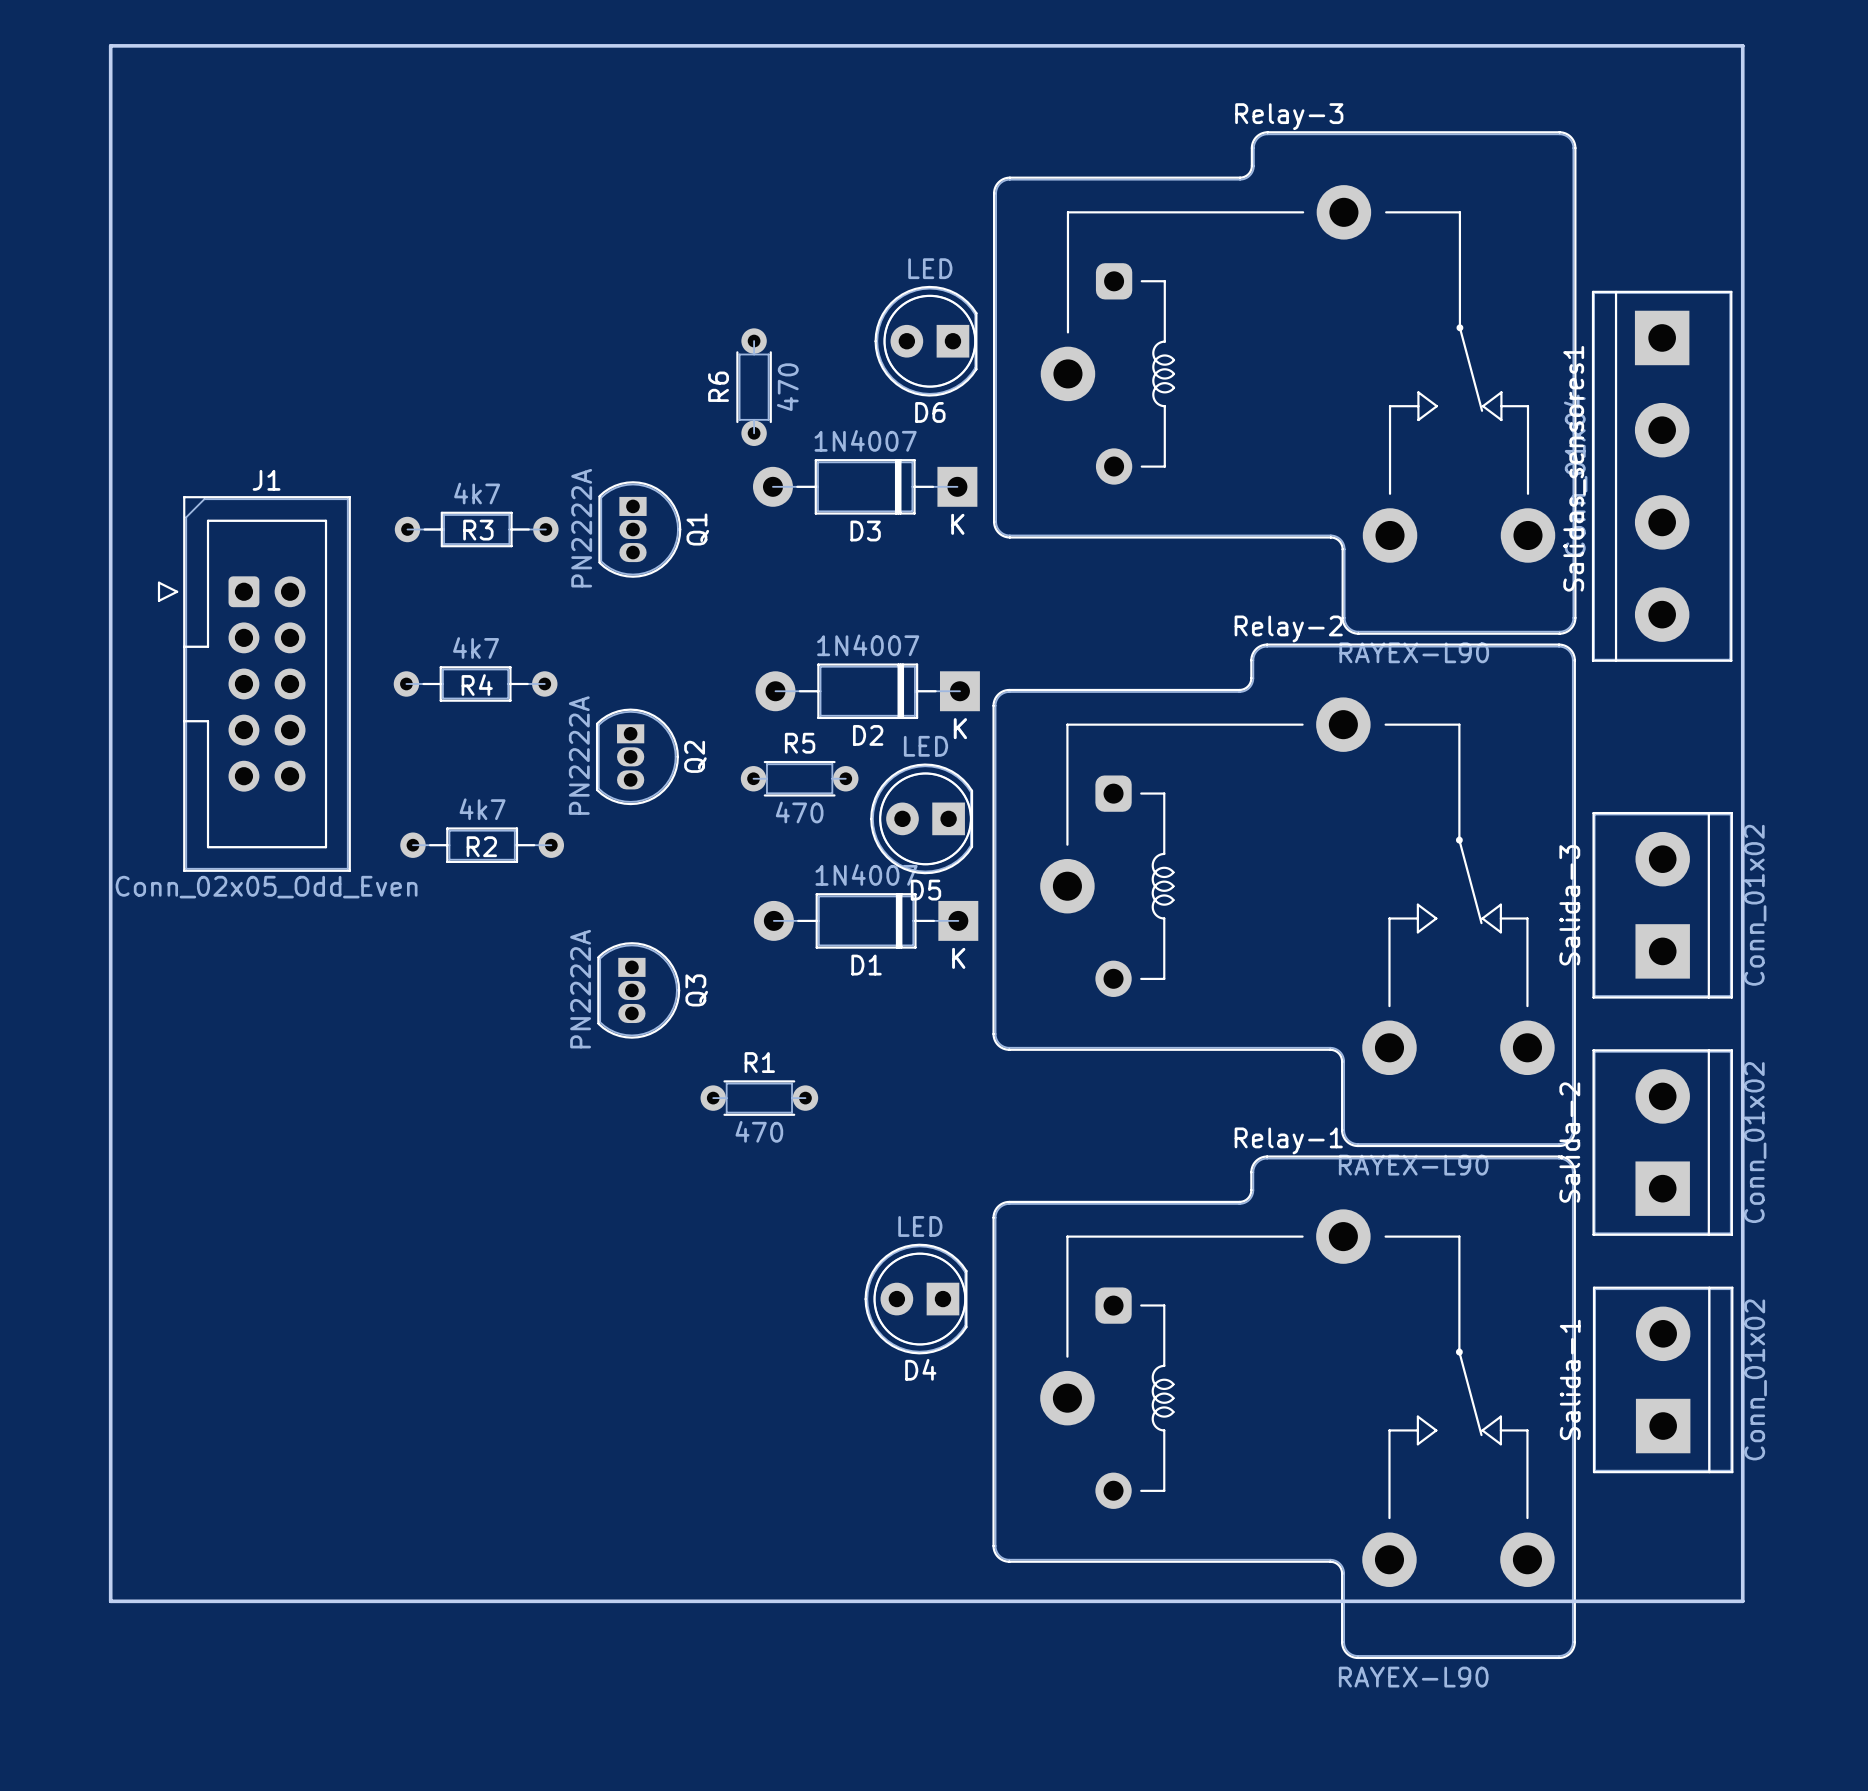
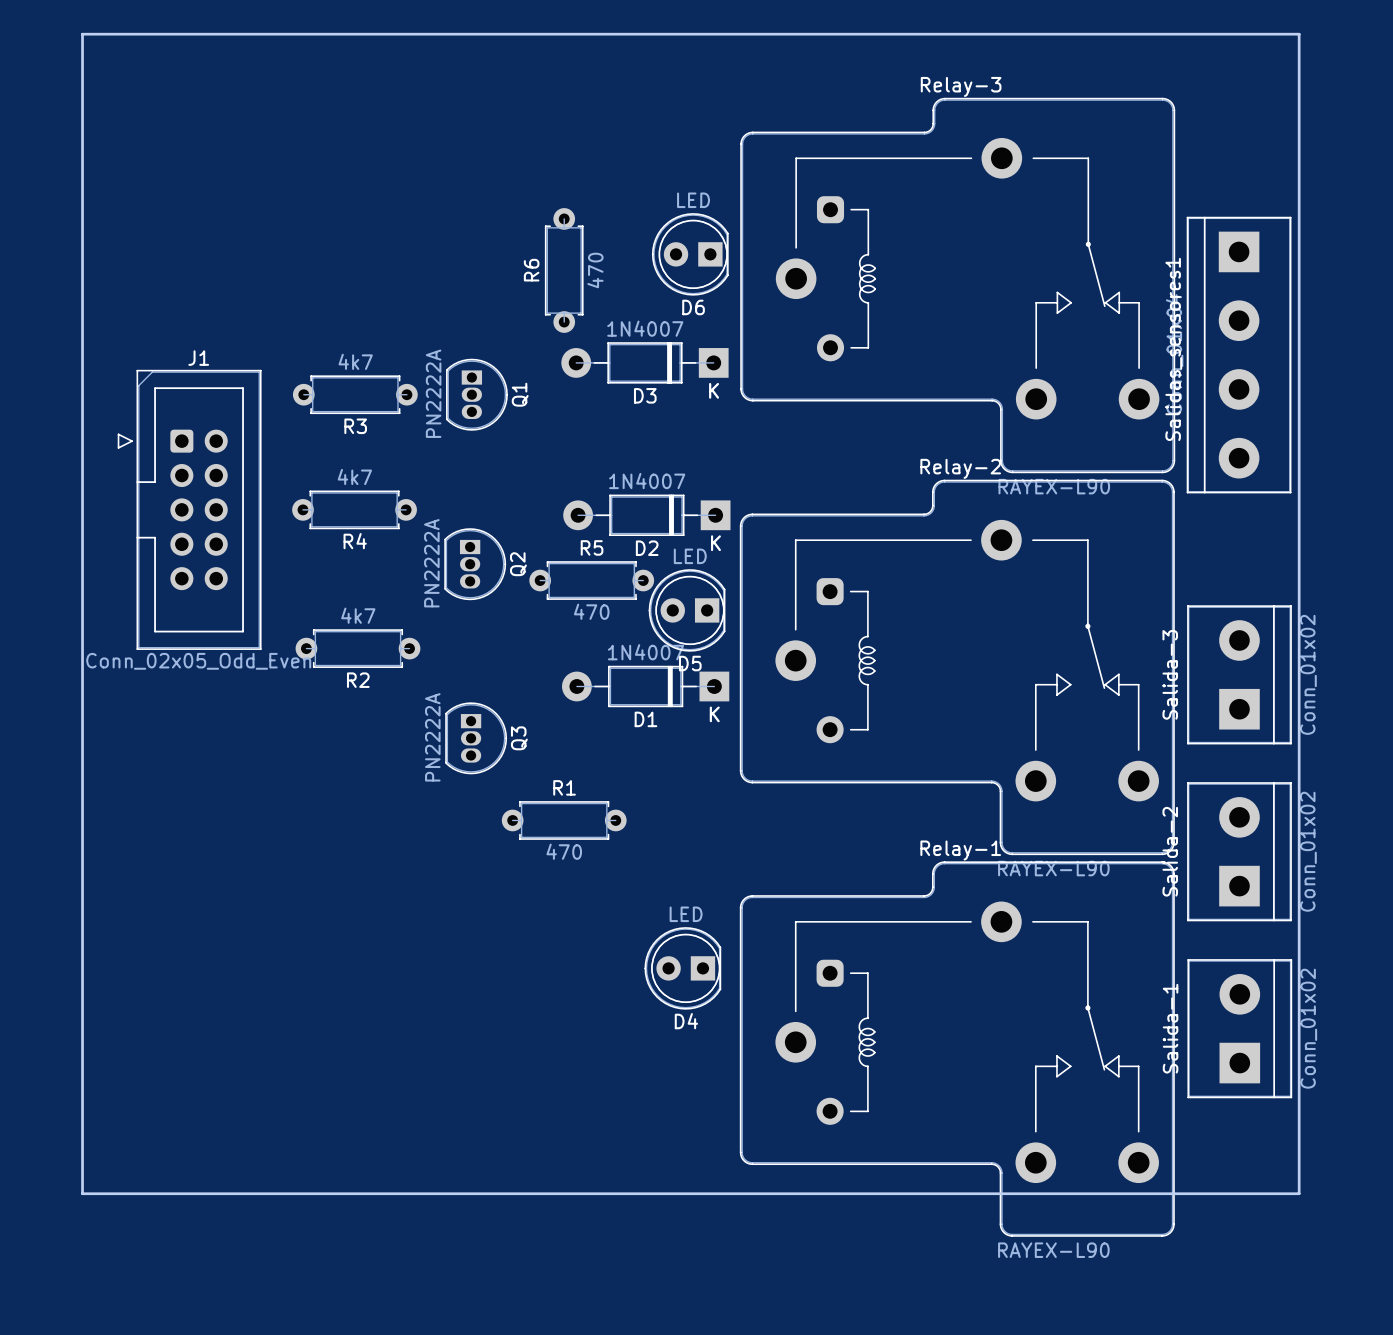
R6 footprint: [736, 328, 772, 446] -> [544, 208, 584, 333]
R3 footprint: [394, 511, 559, 548] -> [292, 375, 418, 415]
R3 name position: R3 (478, 530) -> R3 (355, 426)
R4 footprint: [393, 666, 558, 702] -> [292, 490, 417, 530]
R4 name position: R4 (477, 685) -> R4 (355, 541)
R5 footprint: [740, 760, 859, 797] -> [529, 561, 655, 600]
R2 footprint: [400, 827, 565, 863] -> [295, 629, 421, 668]
R2 name position: R2 (481, 846) -> R2 (358, 680)
R1 footprint: [700, 1080, 819, 1116] -> [501, 801, 627, 840]

